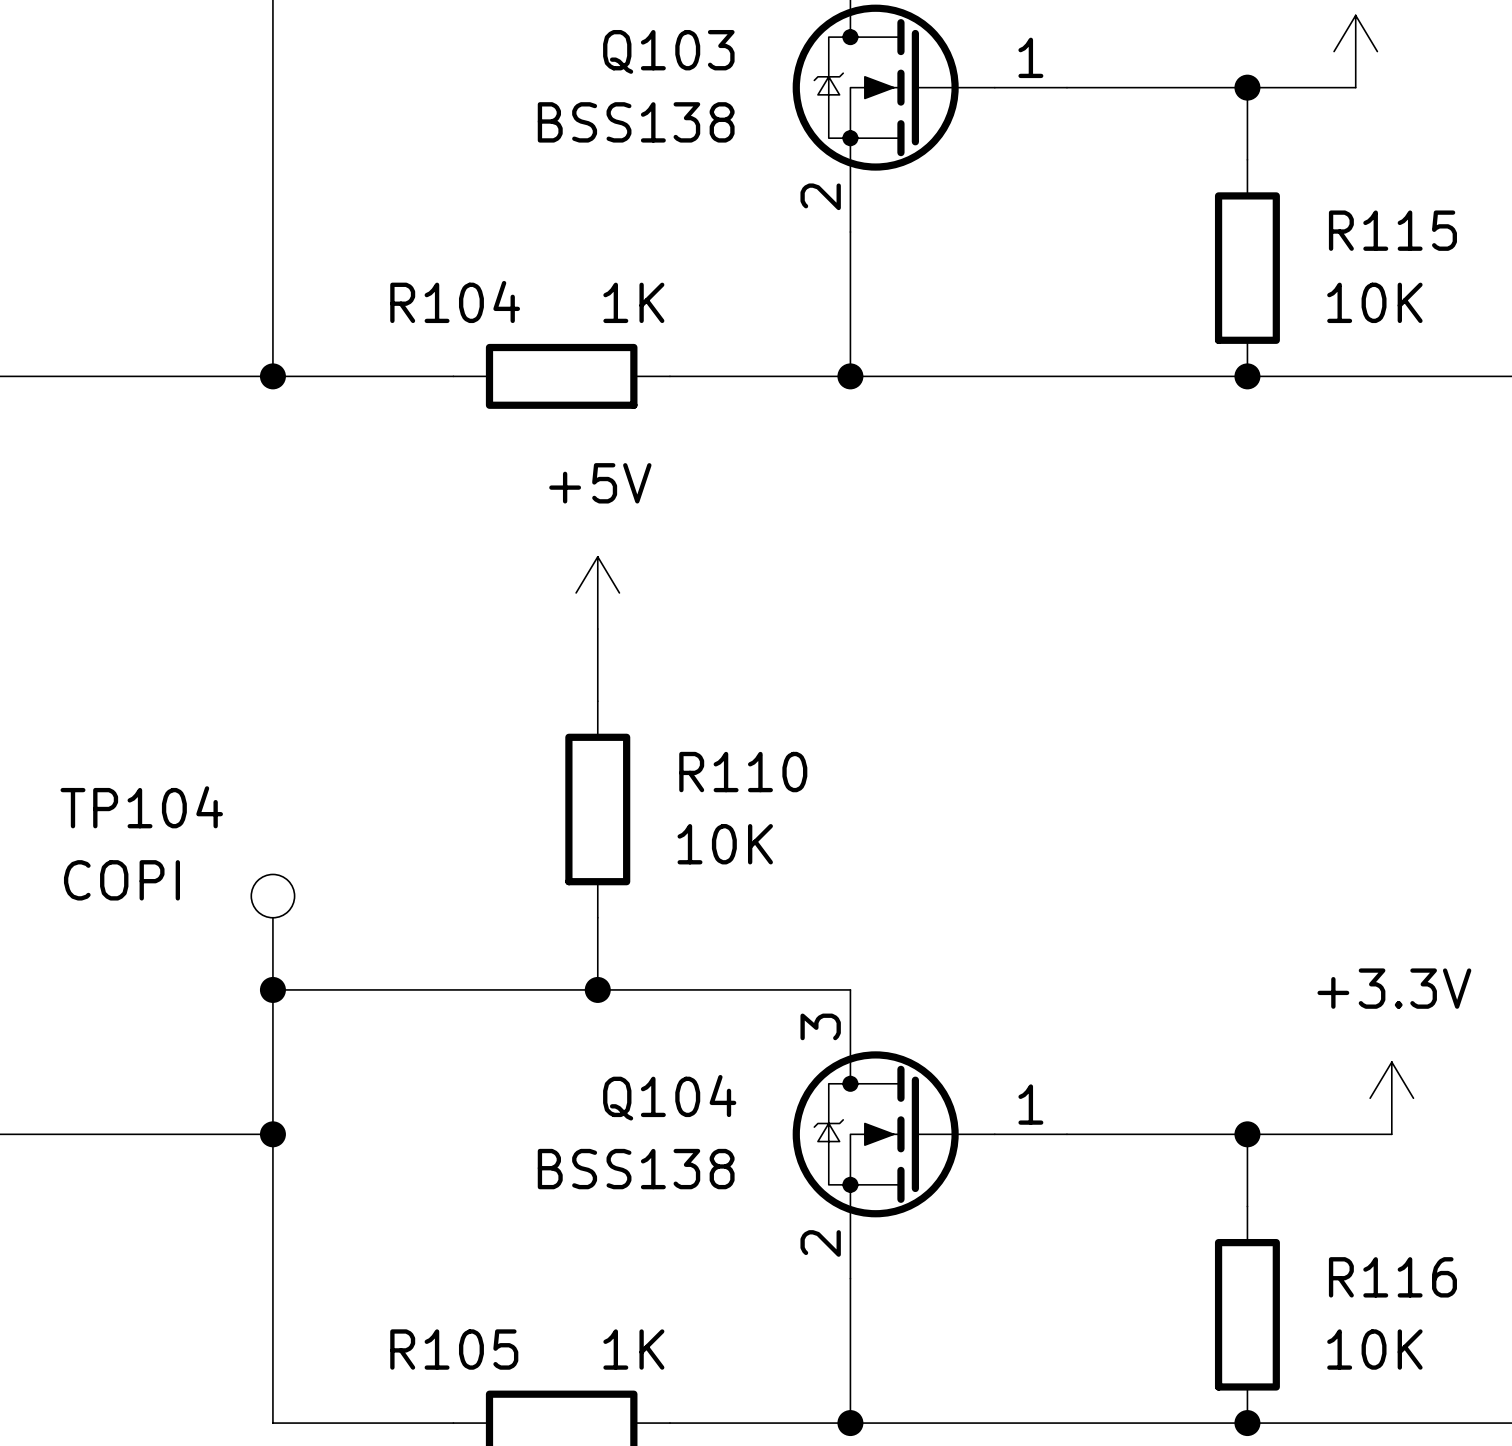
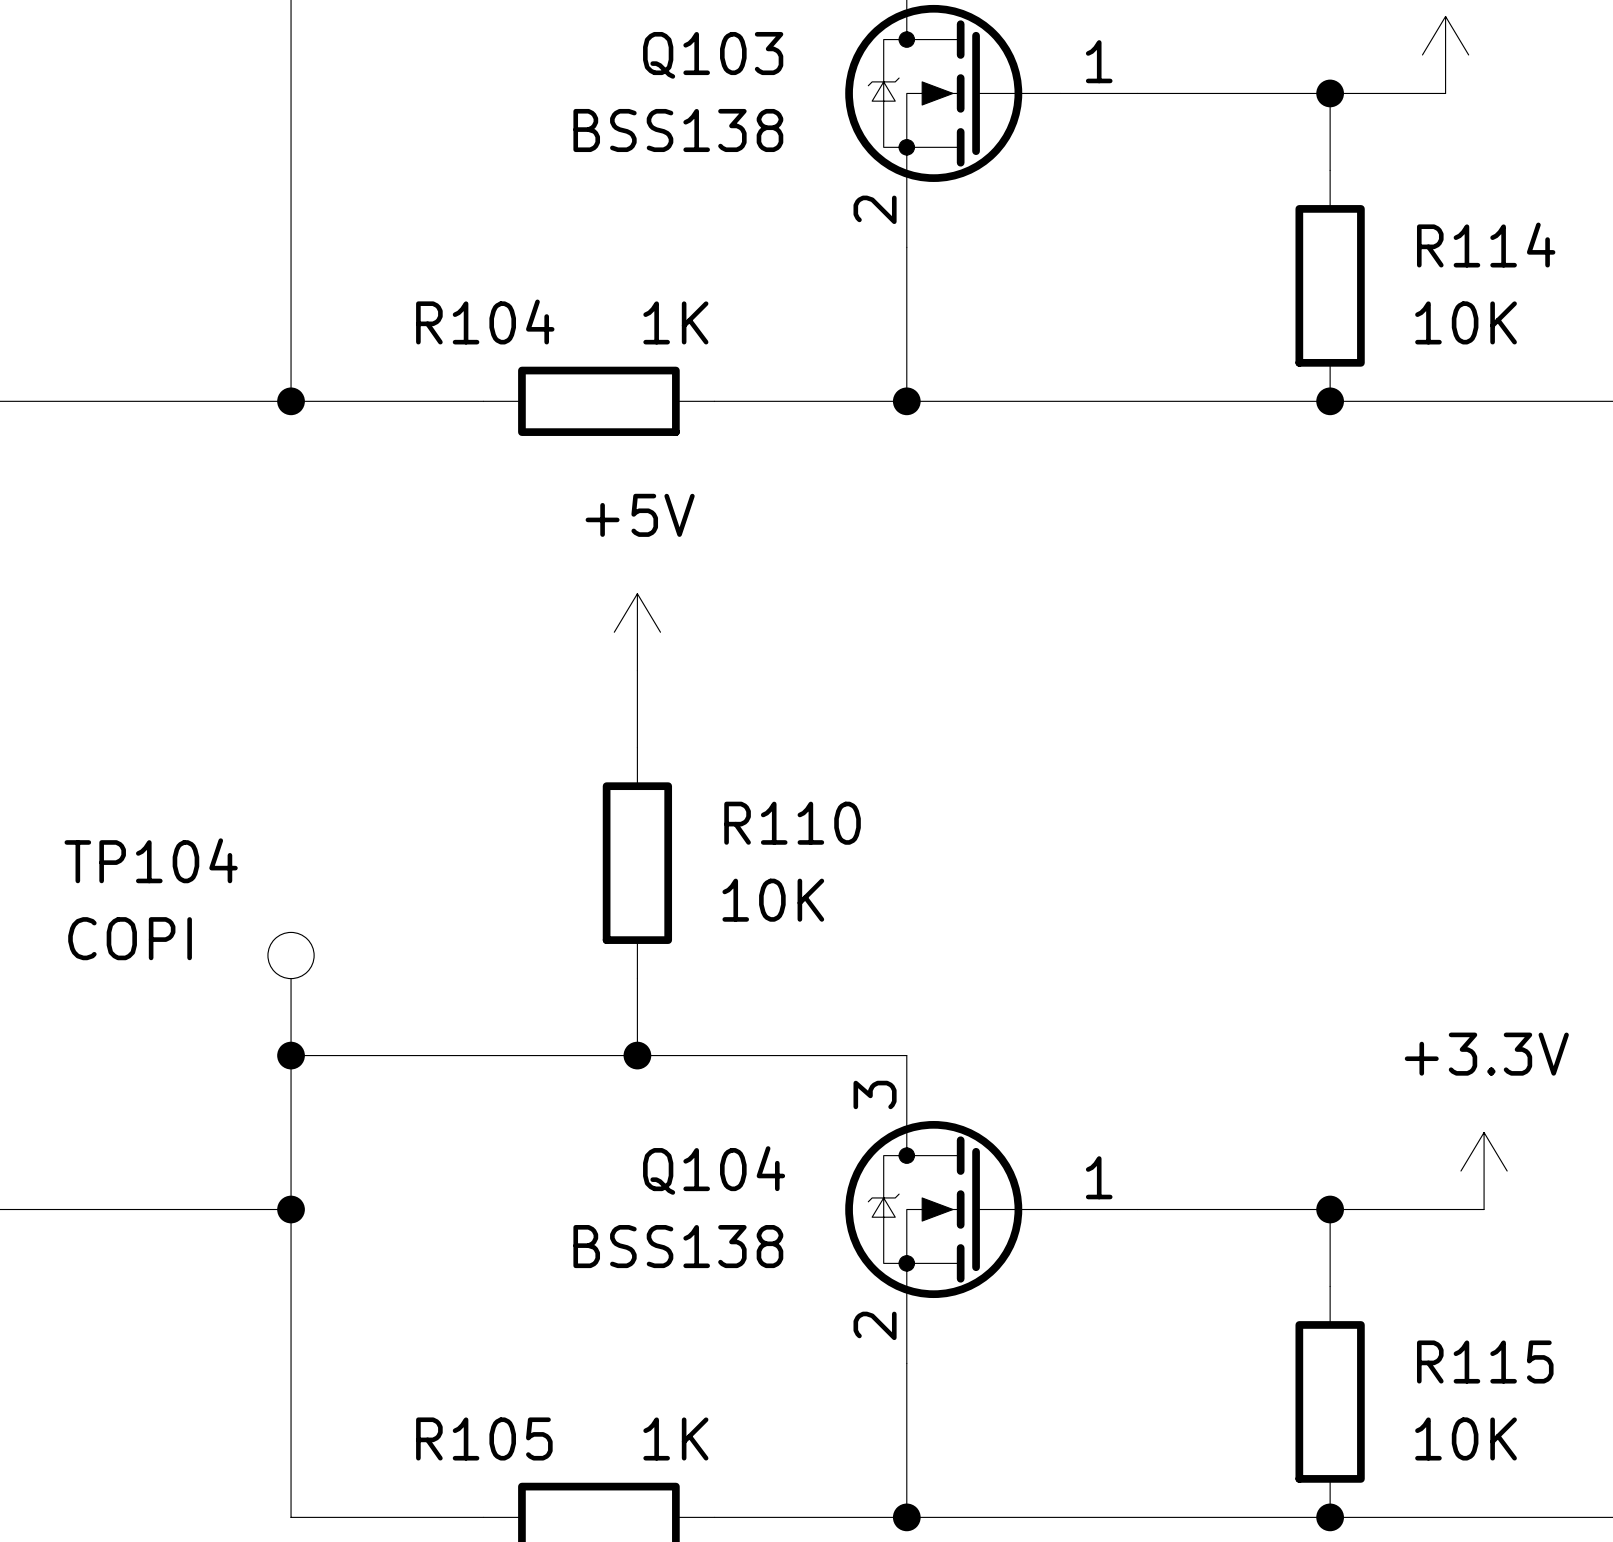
R115 name: R115 (1392, 230) -> R114 (1486, 245)
R116 name: R116 (1392, 1277) -> R115 (1485, 1362)

